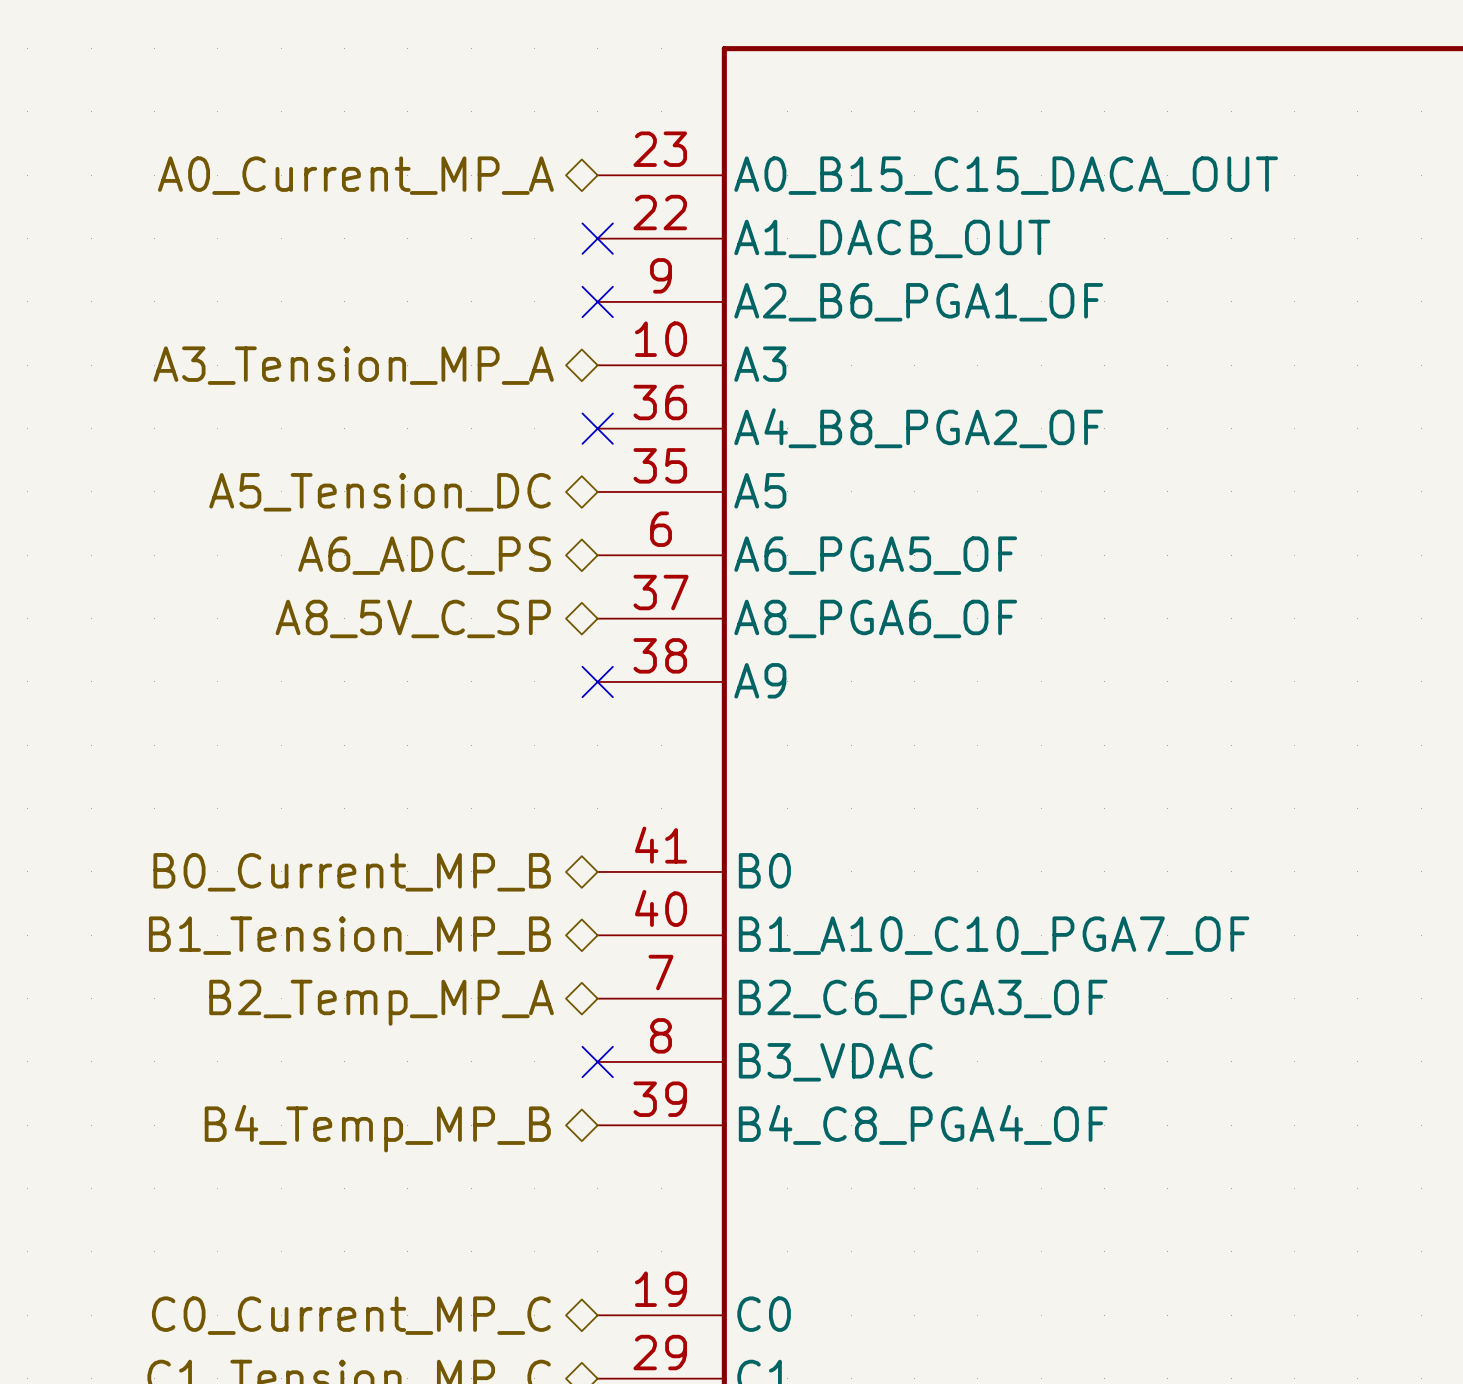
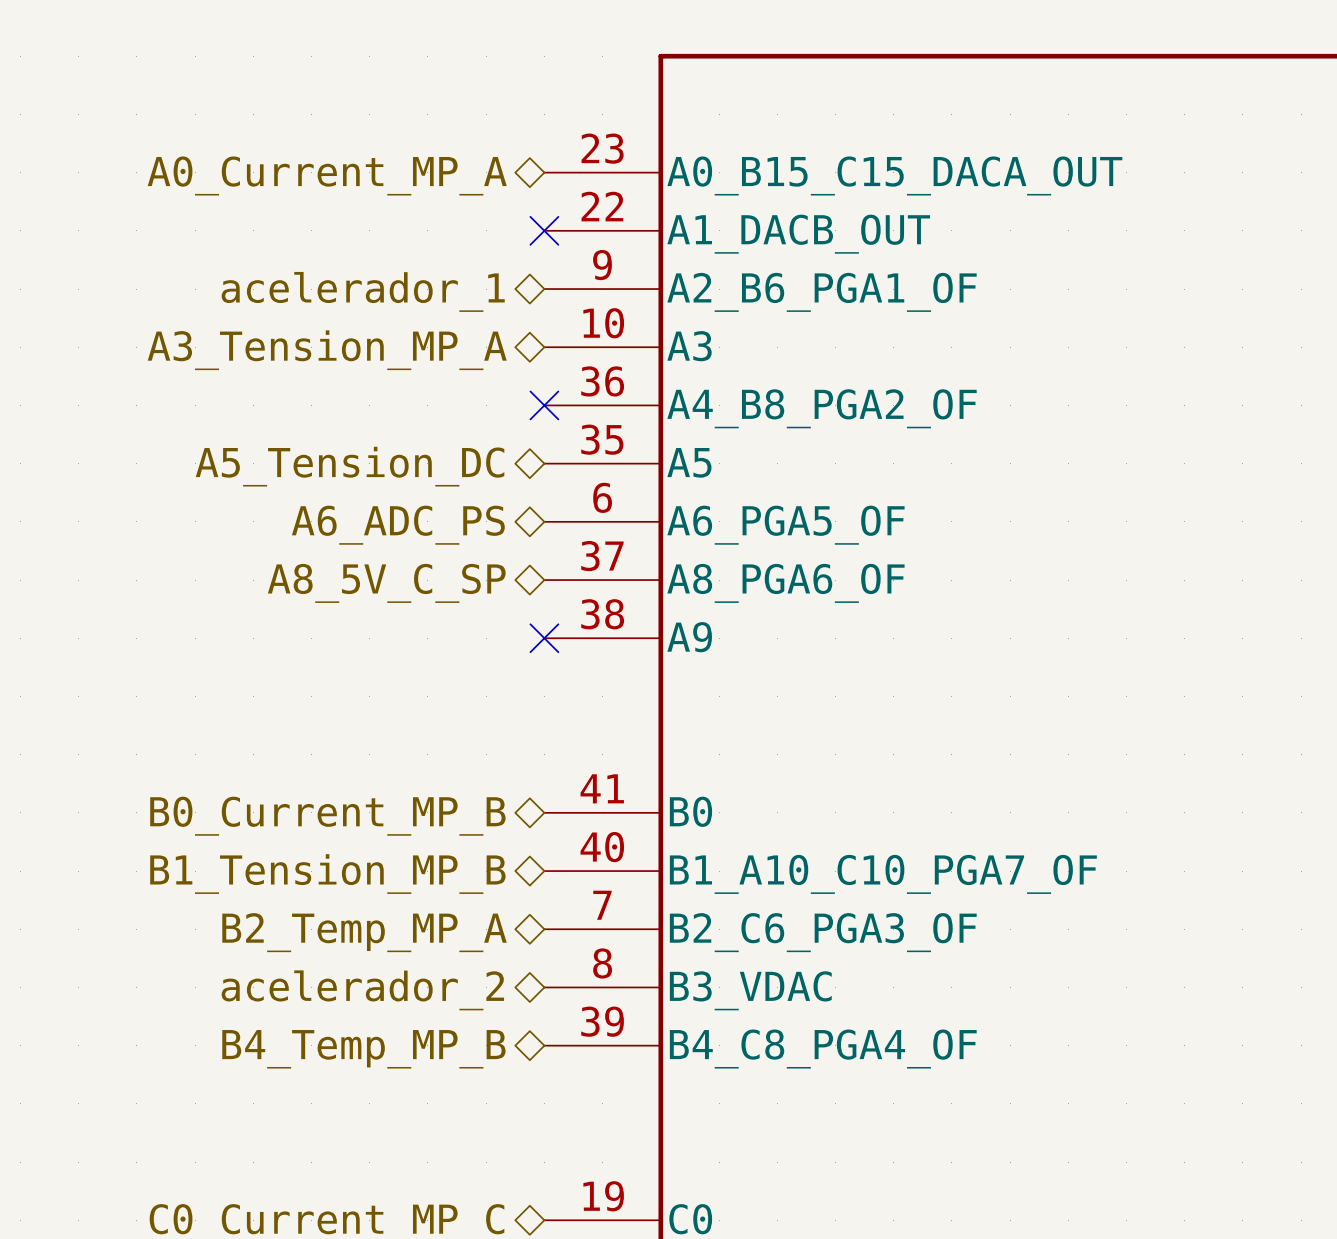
no-connect mark: (597, 301) -> none
hierarchical label: none -> acelerador_1 (363, 291)
no-connect mark: (597, 1061) -> none
hierarchical label: none -> acelerador_2 (362, 990)

